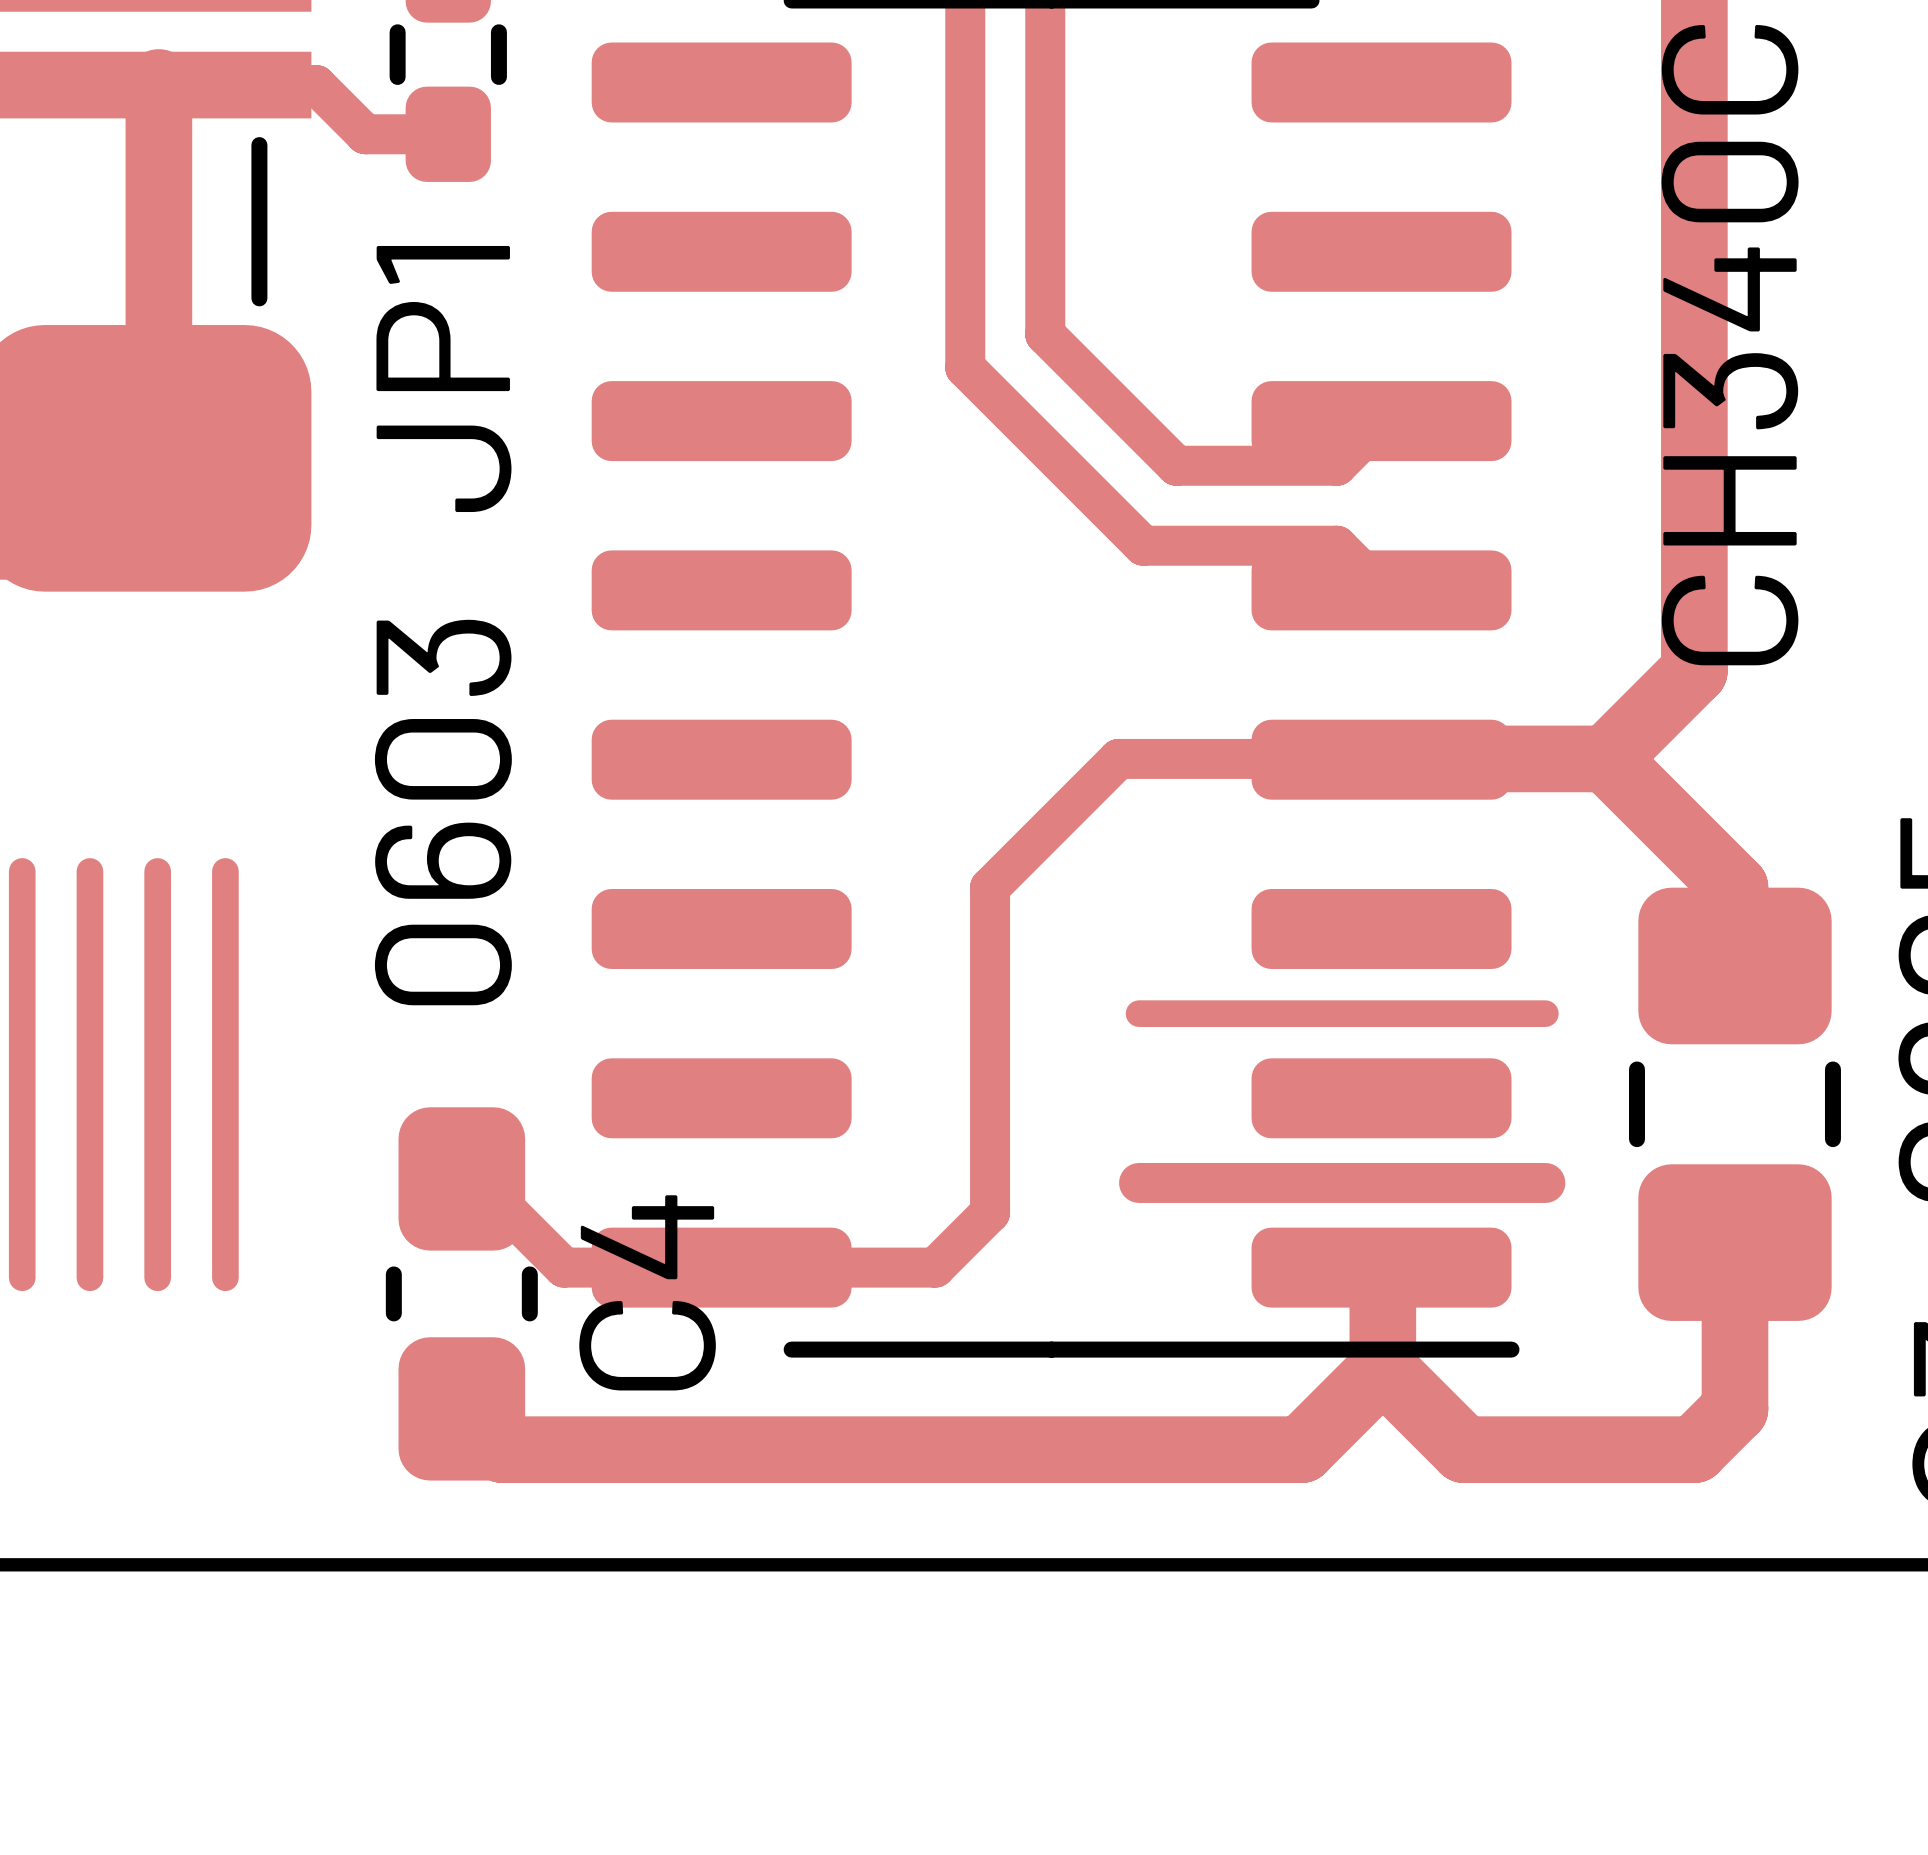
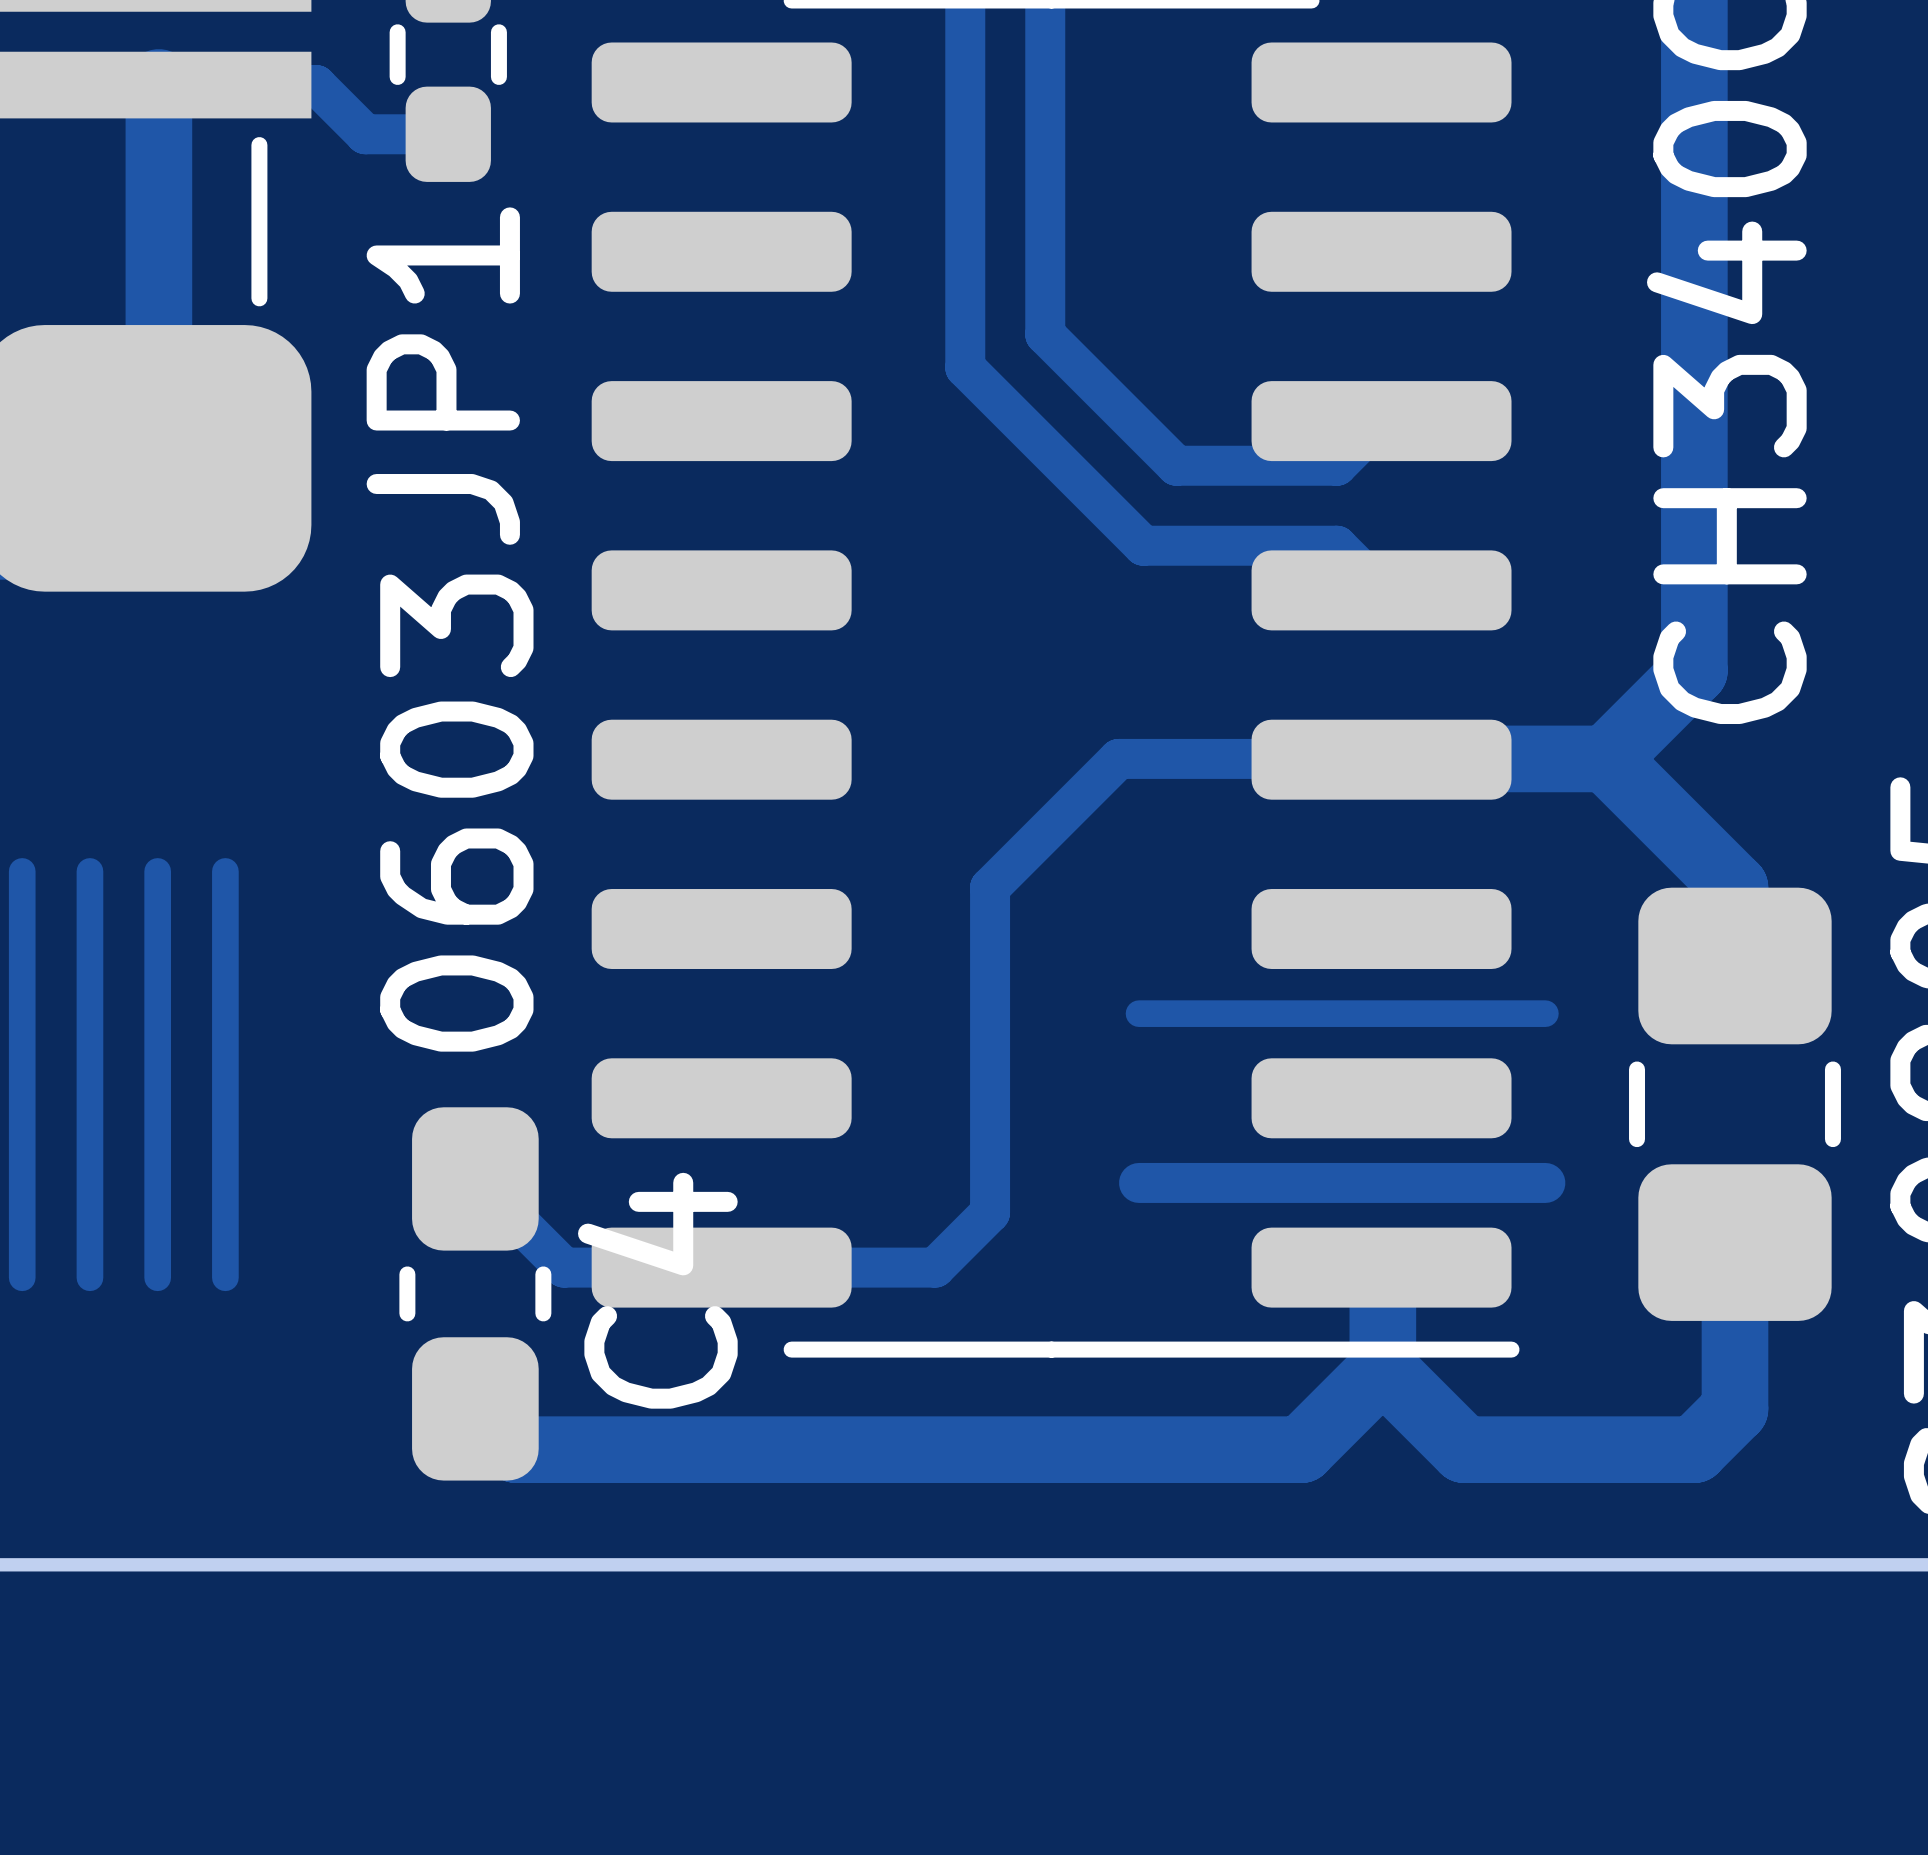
C4 position: (461, 1293) -> (475, 1293)

